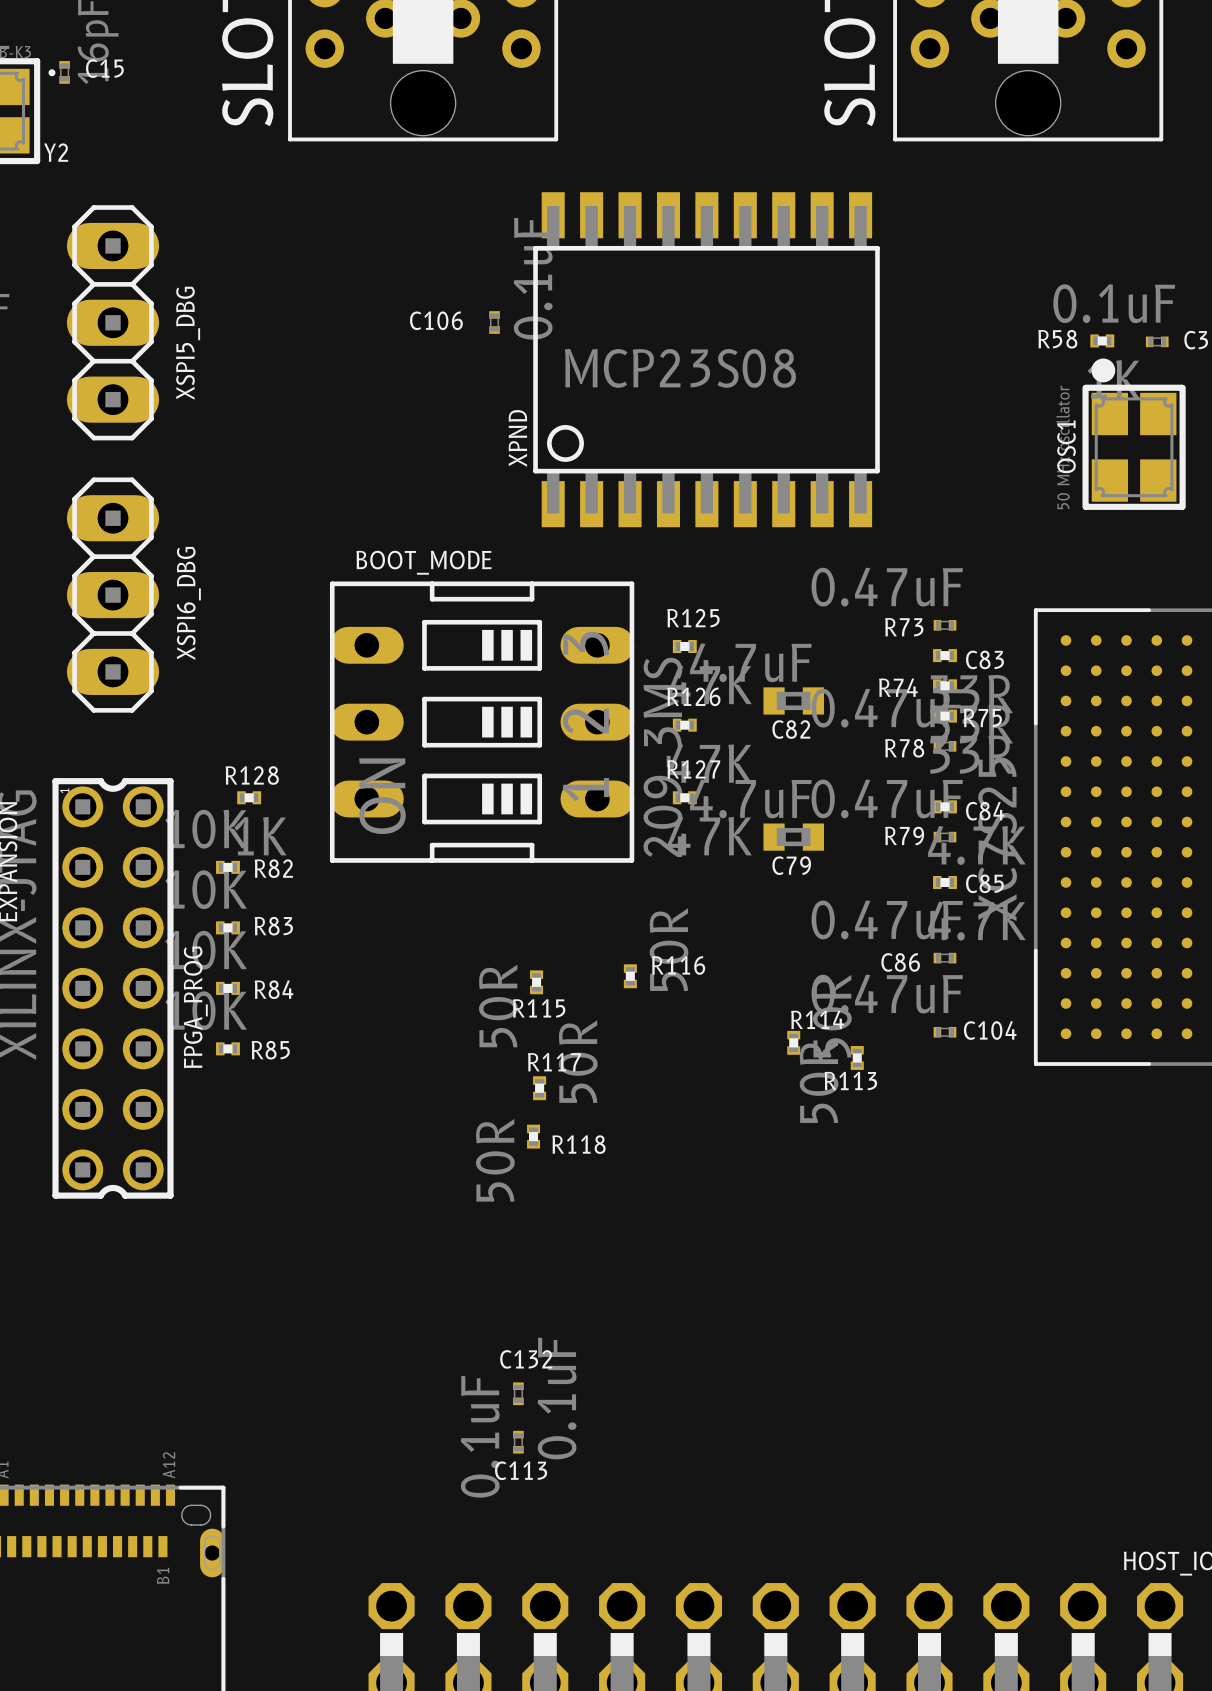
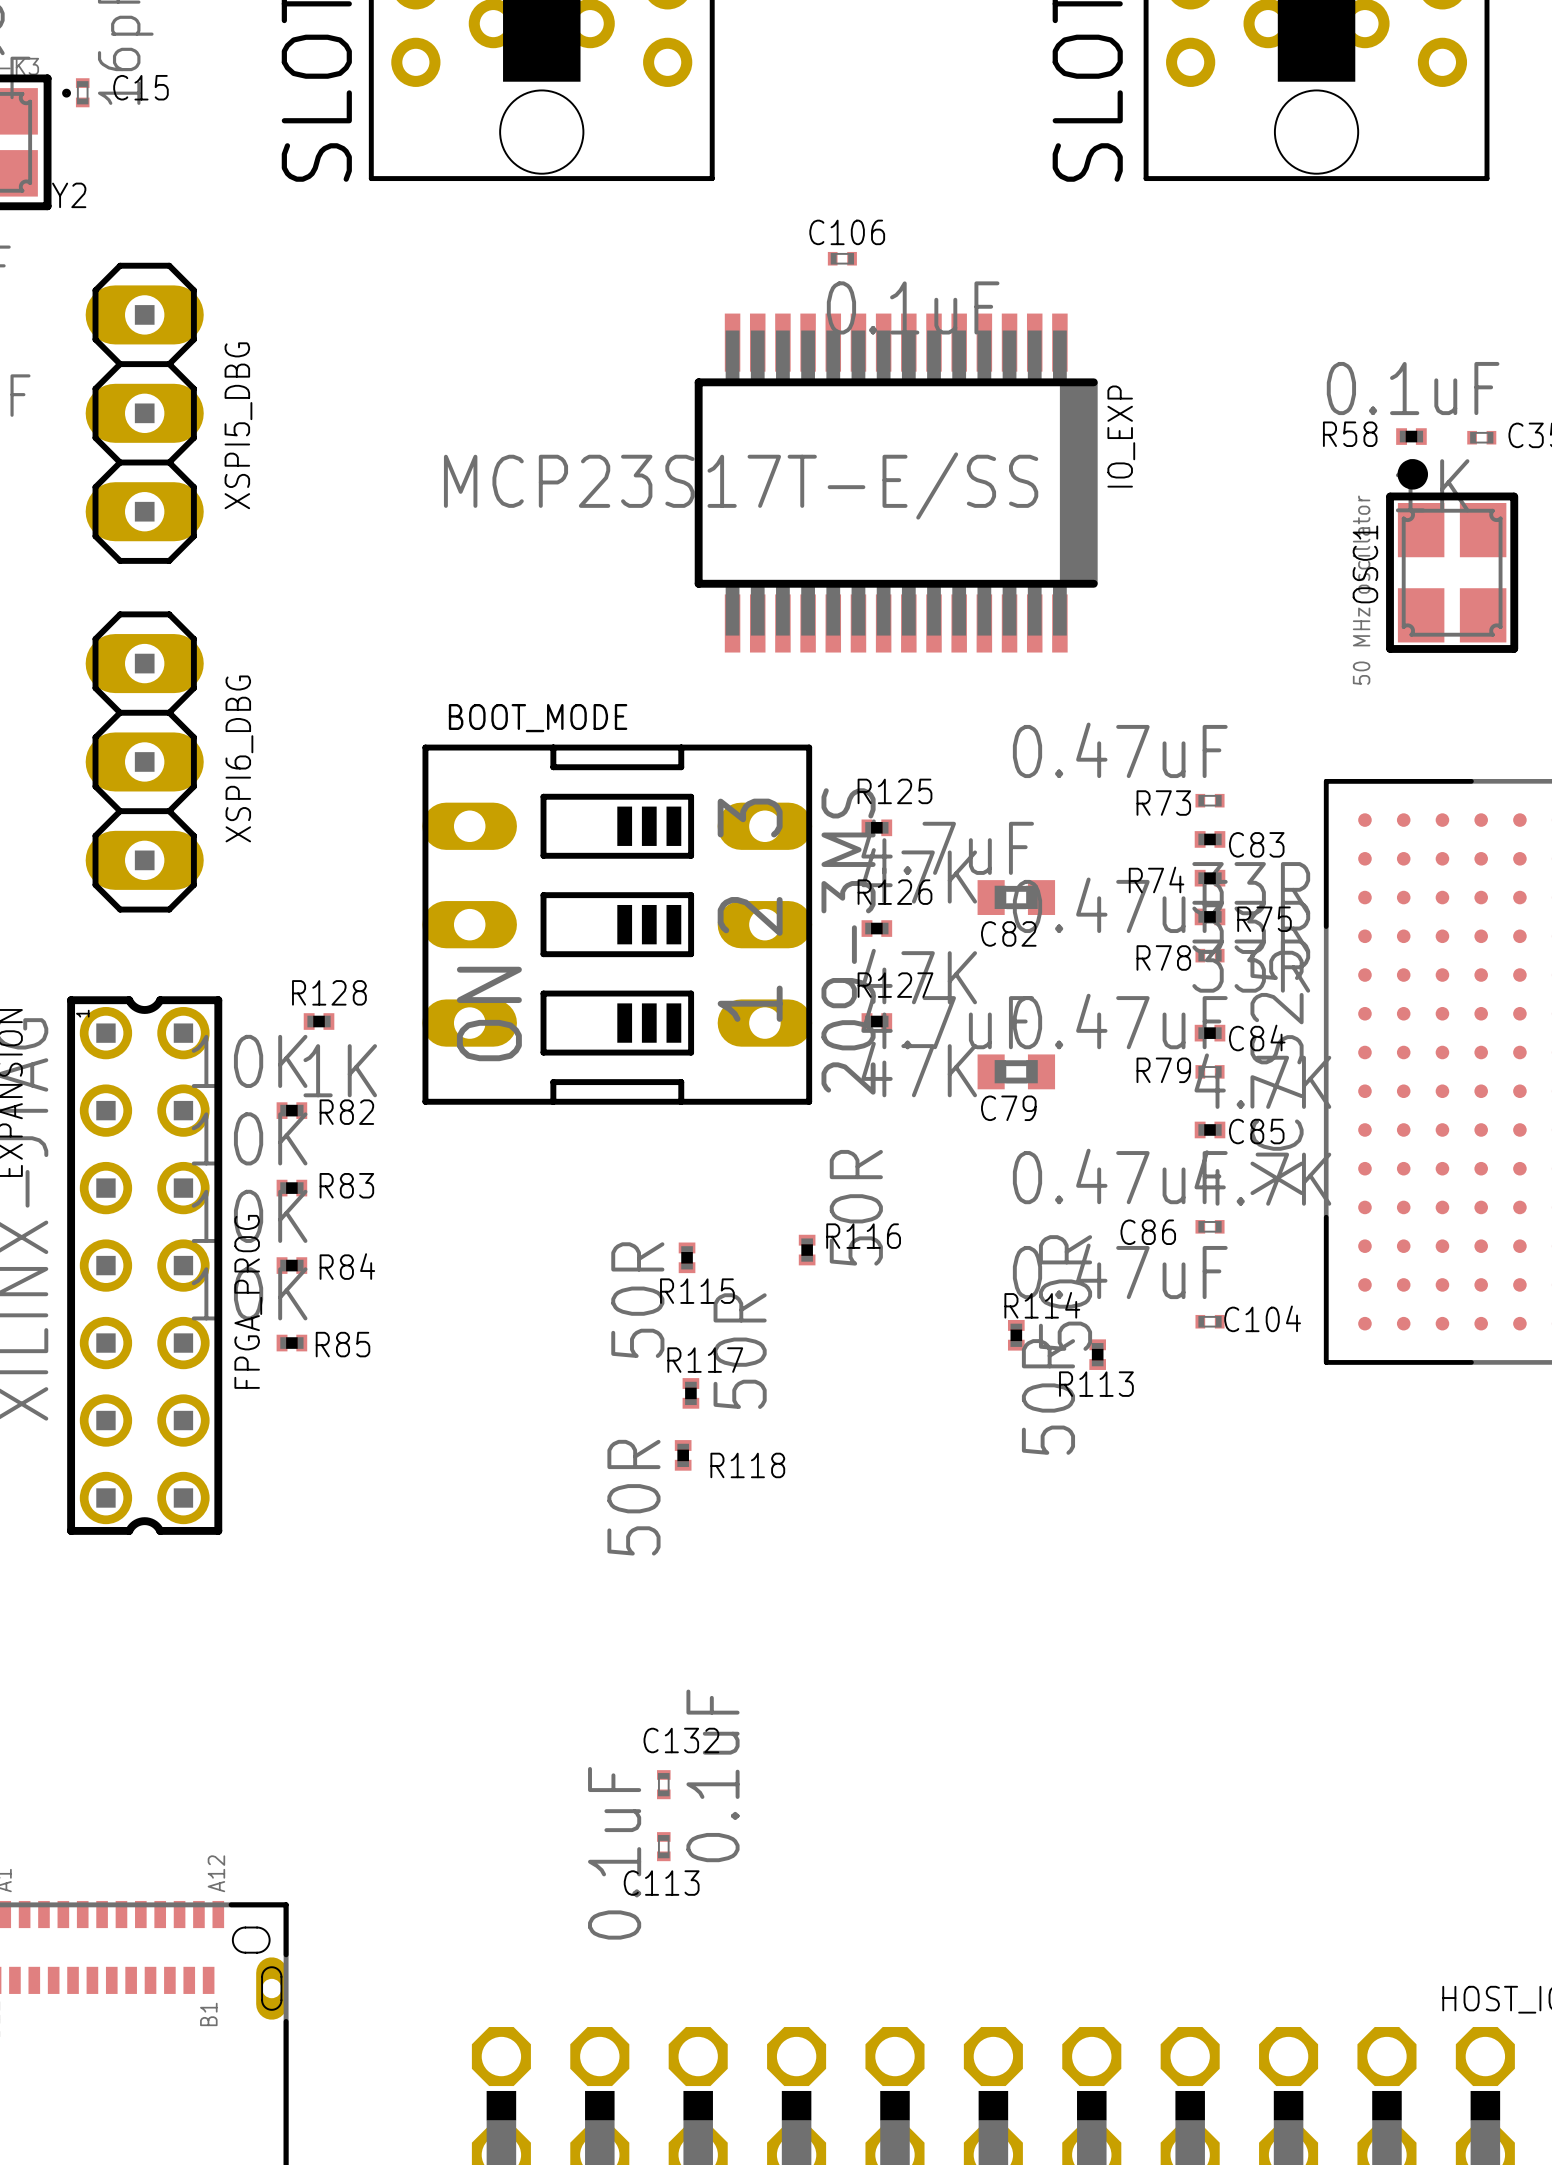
C106 rotation: 0° (494, 322) -> 90° clockwise (842, 258)
C106 position: (494, 322) -> (842, 258)
XPND: MCP23S08 (706, 359) -> none
IO_EXP: none -> MCP23S17T-E/SS (896, 483)

